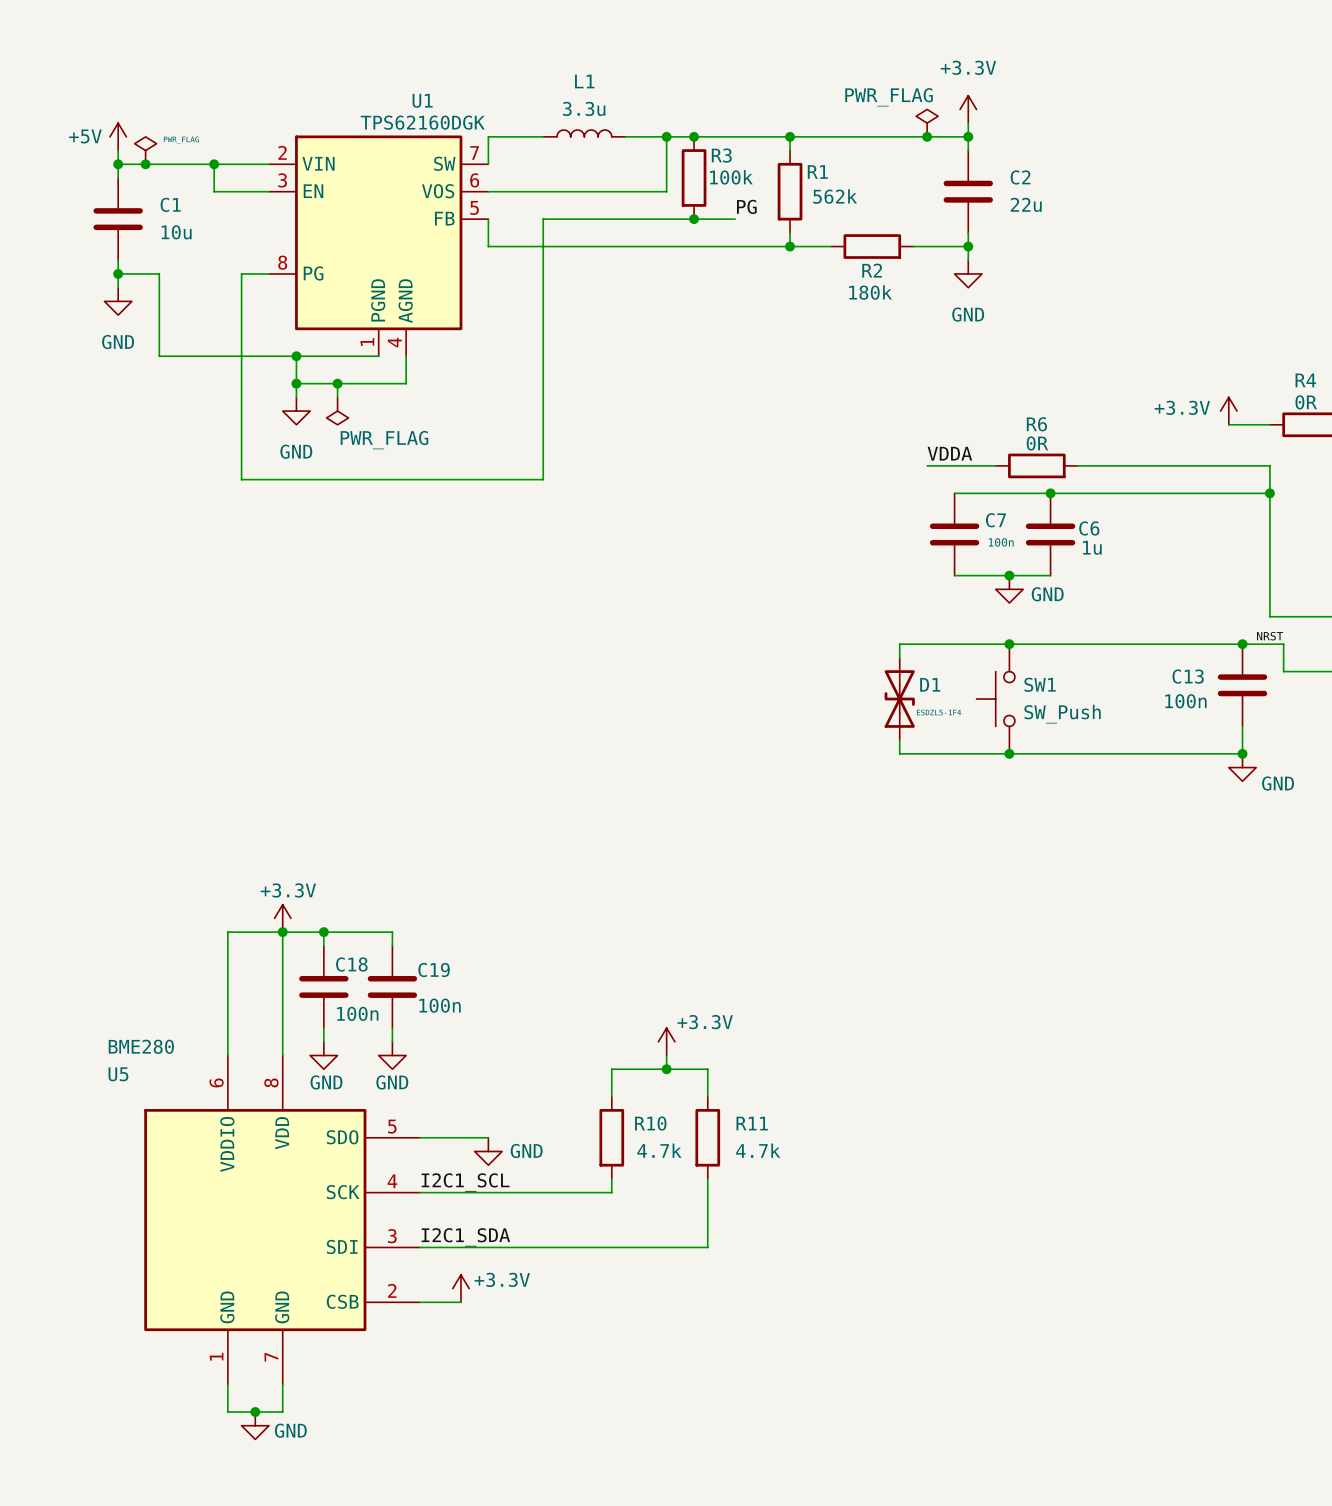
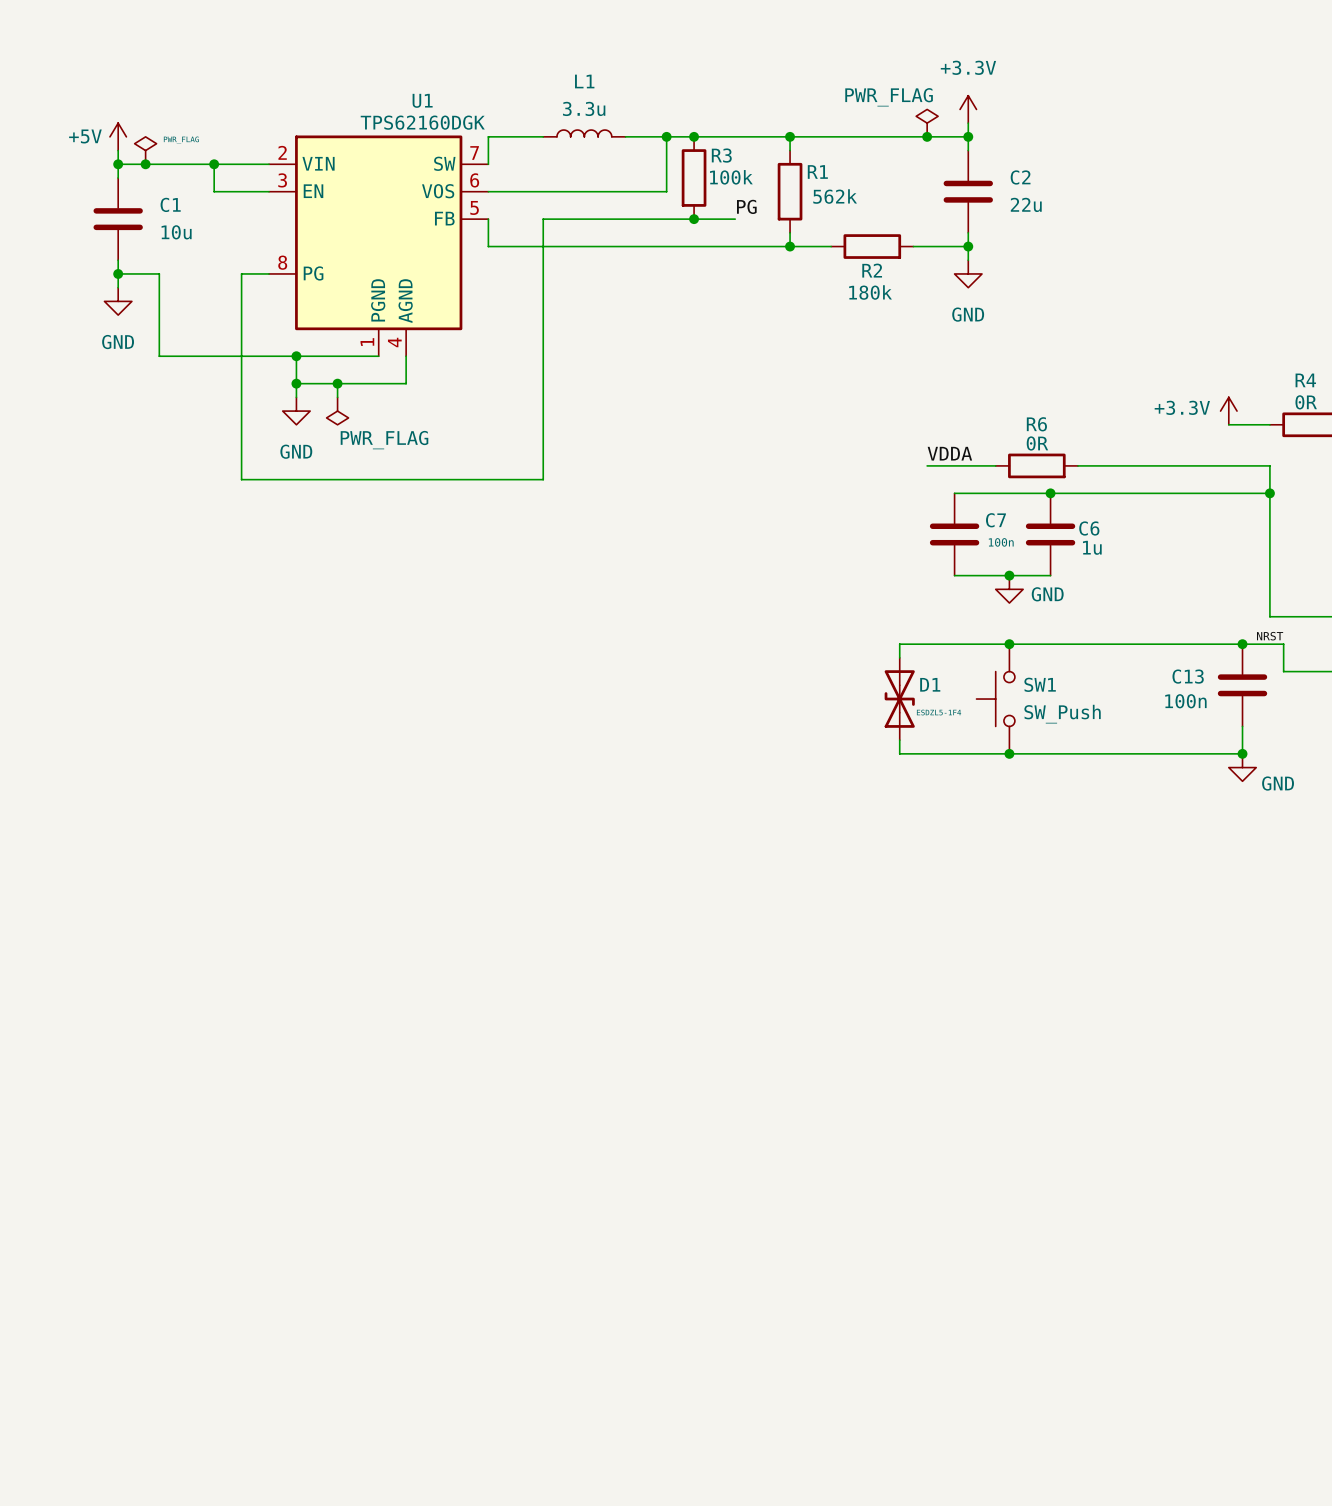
power symbol: +3.3V (282, 918) -> none
wire: (282, 932) (282, 1055) -> none
junction: (282, 932) -> none
wire: (323, 932) (323, 945) -> none
junction: (323, 932) -> none
wire: (392, 945) (392, 932) (227, 932) (227, 1055) -> none
C18: 100n (323, 986) -> none
C19: 100n (392, 986) -> none
wire: (323, 1028) (323, 1041) -> none
wire: (392, 1028) (392, 1041) -> none
power symbol: +3.3V (666, 1041) -> none
power symbol: GND (323, 1055) -> none
power symbol: GND (392, 1055) -> none
wire: (666, 1055) (666, 1069) -> none
junction: (666, 1069) -> none
wire: (611, 1096) (611, 1069) (707, 1069) (707, 1096) -> none
wire: (419, 1137) (488, 1137) -> none
R10: 4.7k (611, 1137) -> none
R11: 4.7k (707, 1137) -> none
power symbol: GND (488, 1151) -> none
wire: (611, 1178) (611, 1192) (419, 1192) -> none
wire: (707, 1178) (707, 1247) (419, 1247) -> none
label: I2C1_SCL (465, 1182) -> none
U5: BME280 (282, 1220) -> none
label: I2C1_SDA (465, 1237) -> none
power symbol: +3.3V (460, 1288) -> none
wire: (419, 1302) (460, 1302) -> none
wire: (227, 1384) (227, 1412) (282, 1412) (282, 1384) -> none
junction: (255, 1412) -> none
power symbol: GND (255, 1425) -> none

